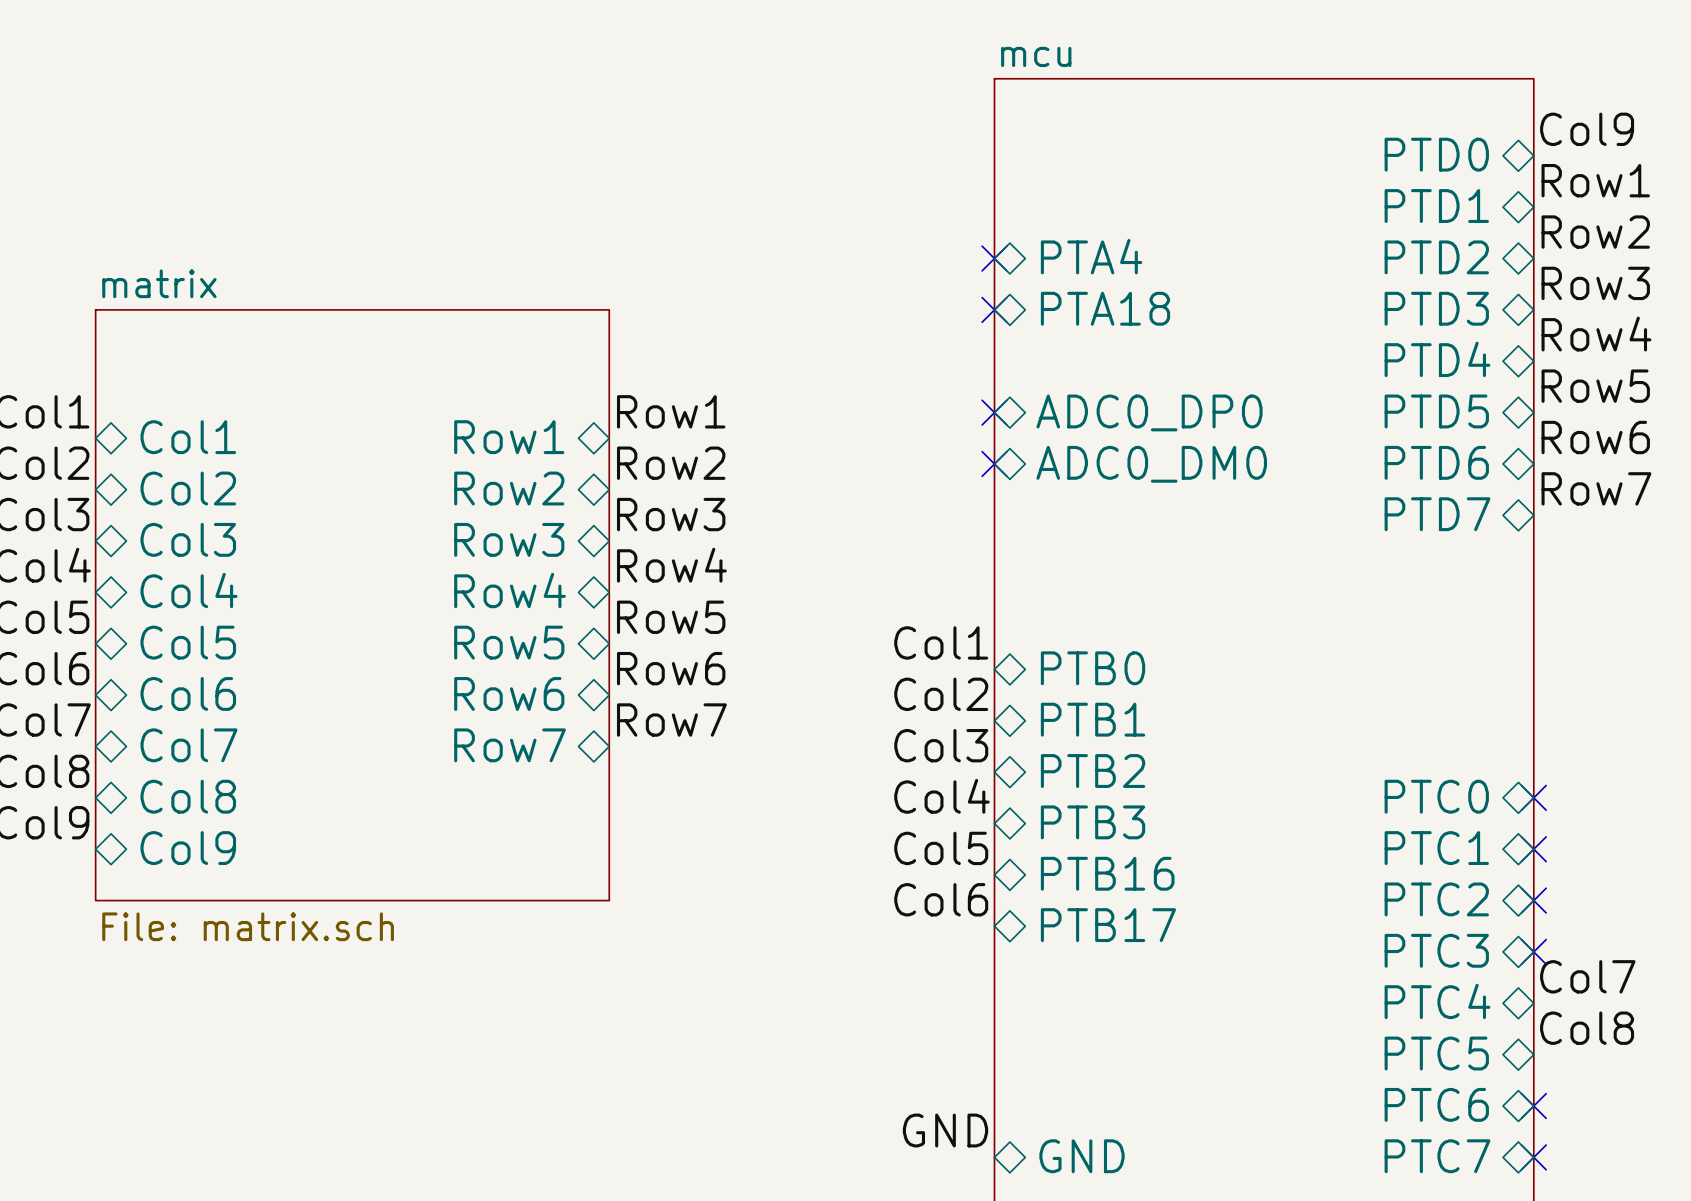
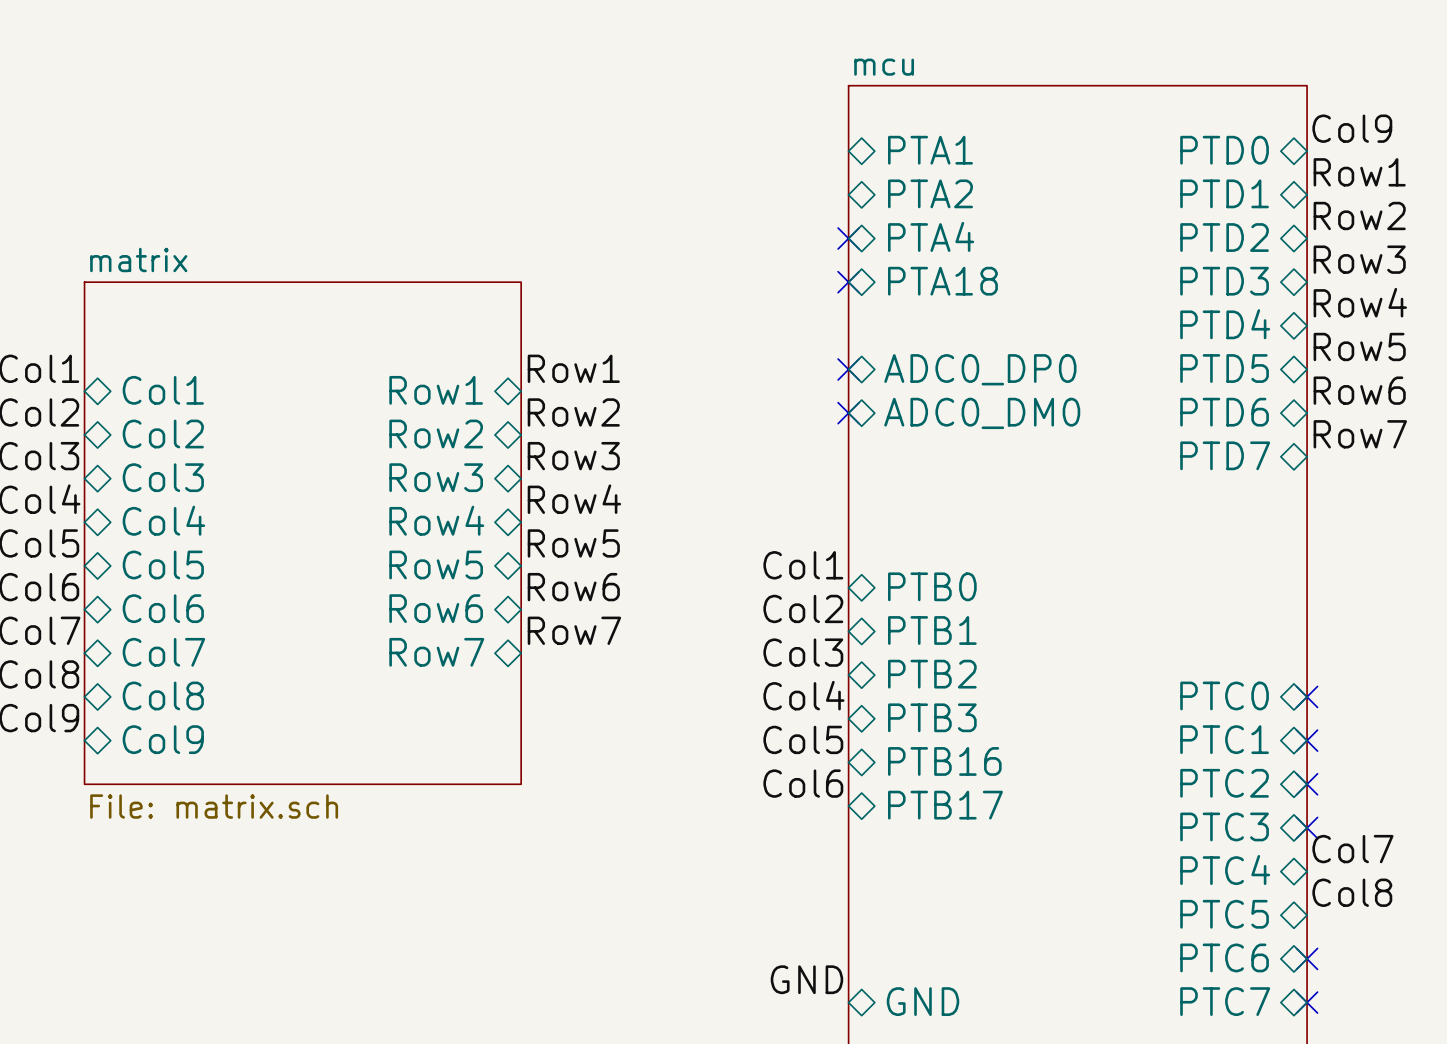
sheet pin: none -> PTA1 (930, 150)
sheet pin: none -> PTA2 (930, 193)

